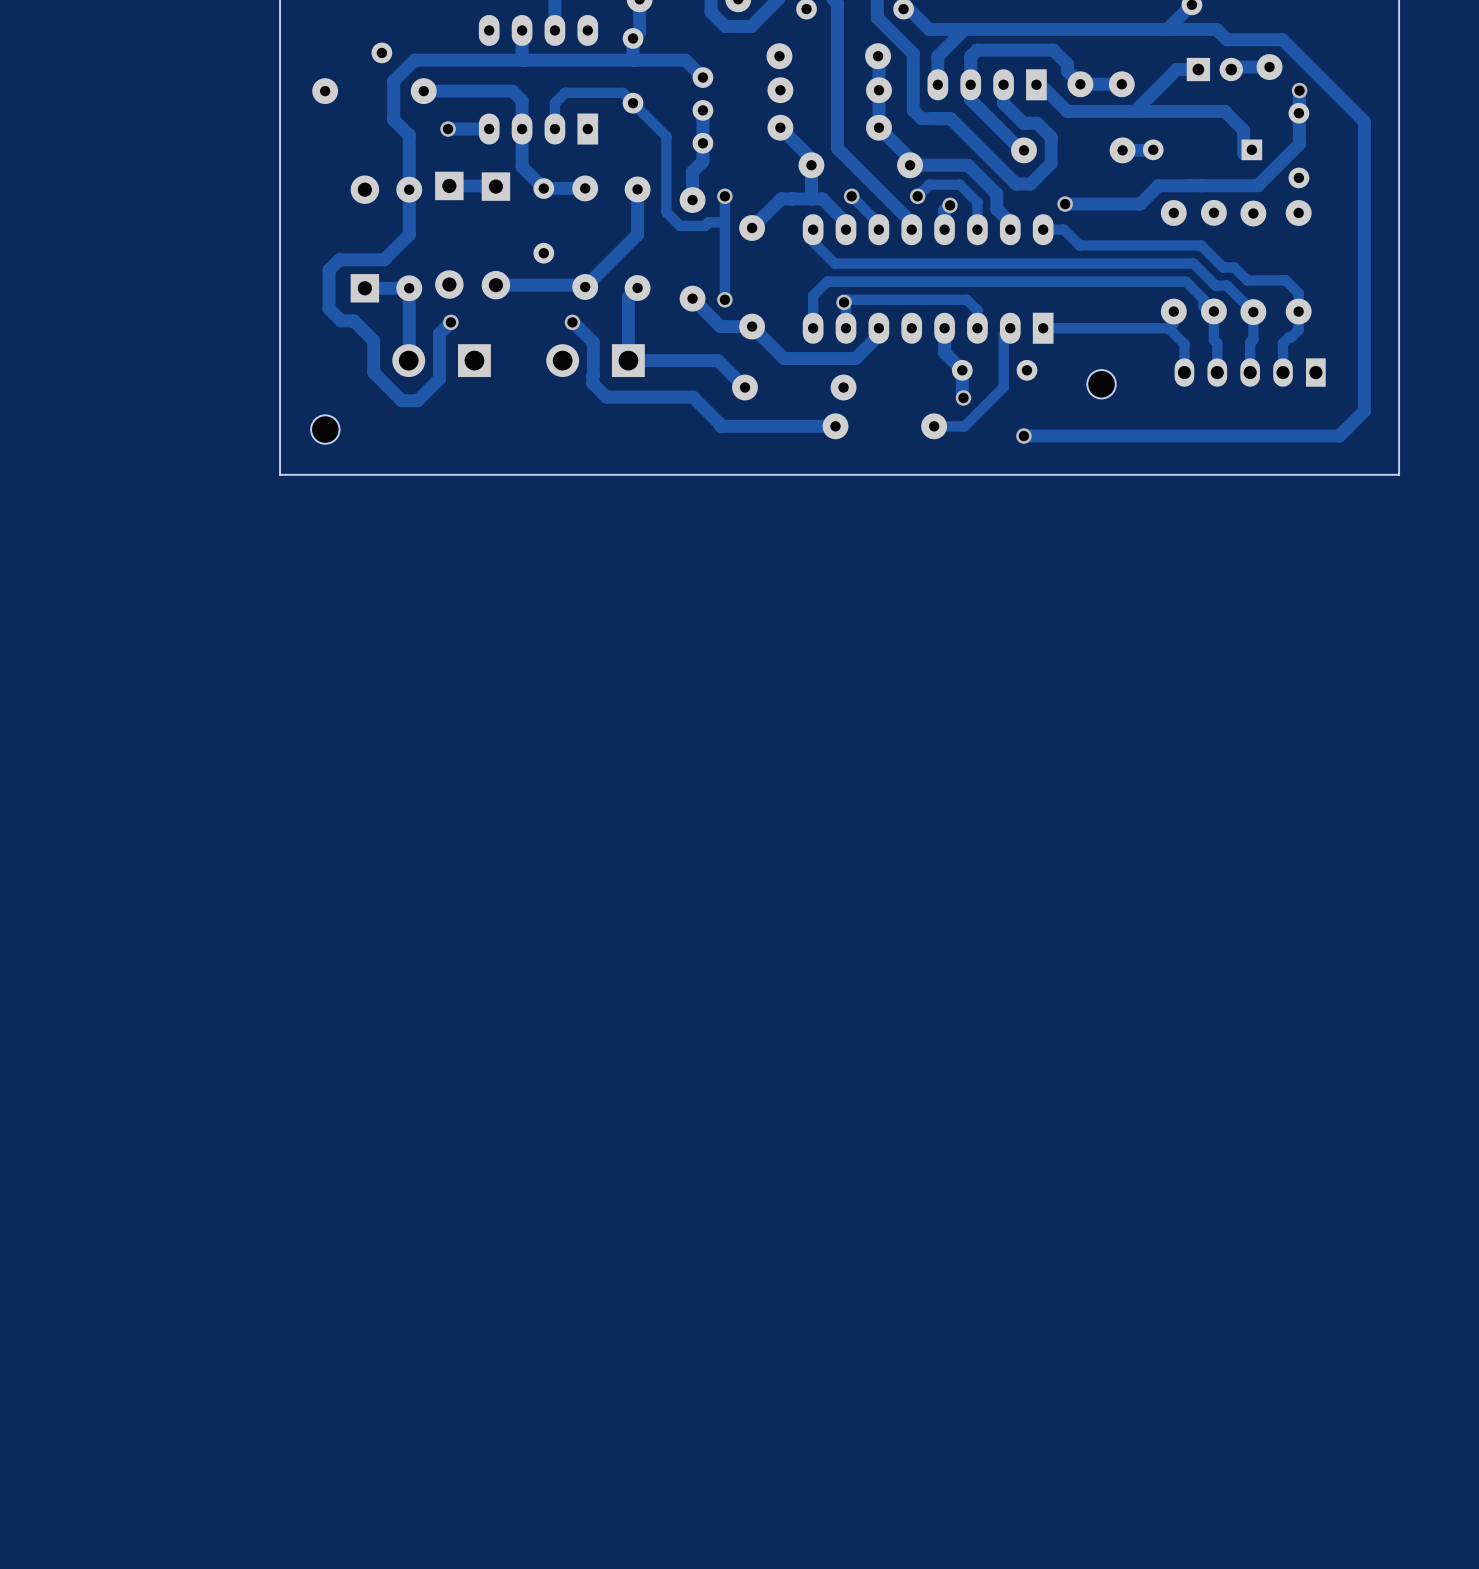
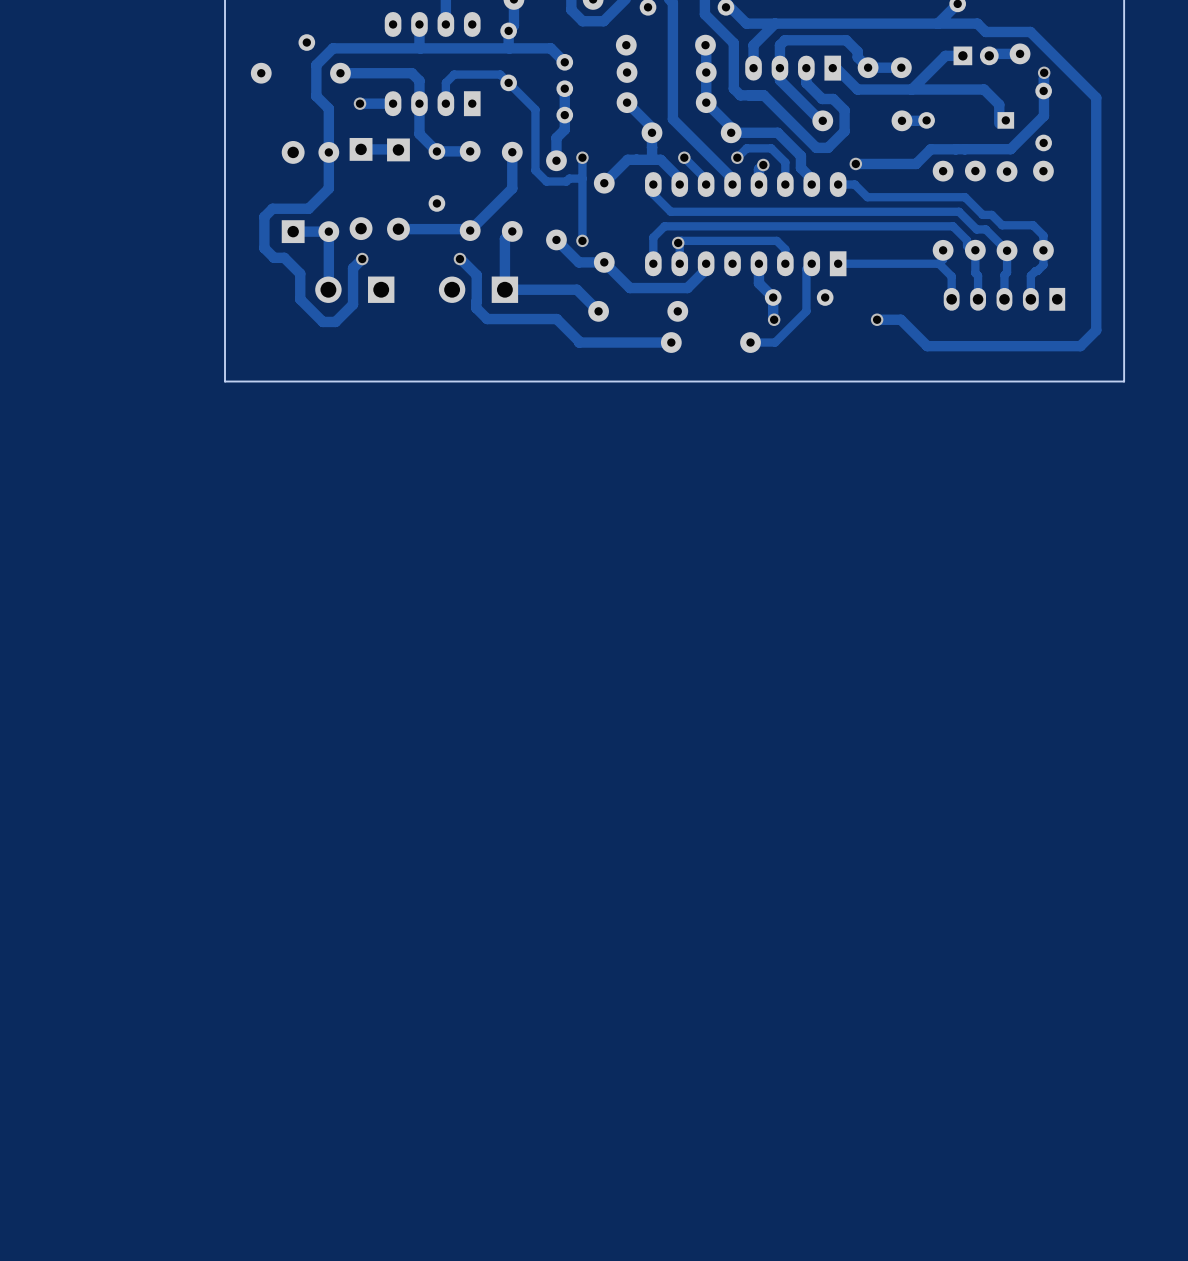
part: (1101, 384) -> none
via: none -> (877, 319)
part: (325, 429) -> none
track: (1344, 430) (1339, 436) (1023, 436) -> (1080, 346) (927, 346) (900, 319) (877, 319)
via: (1023, 436) -> none

